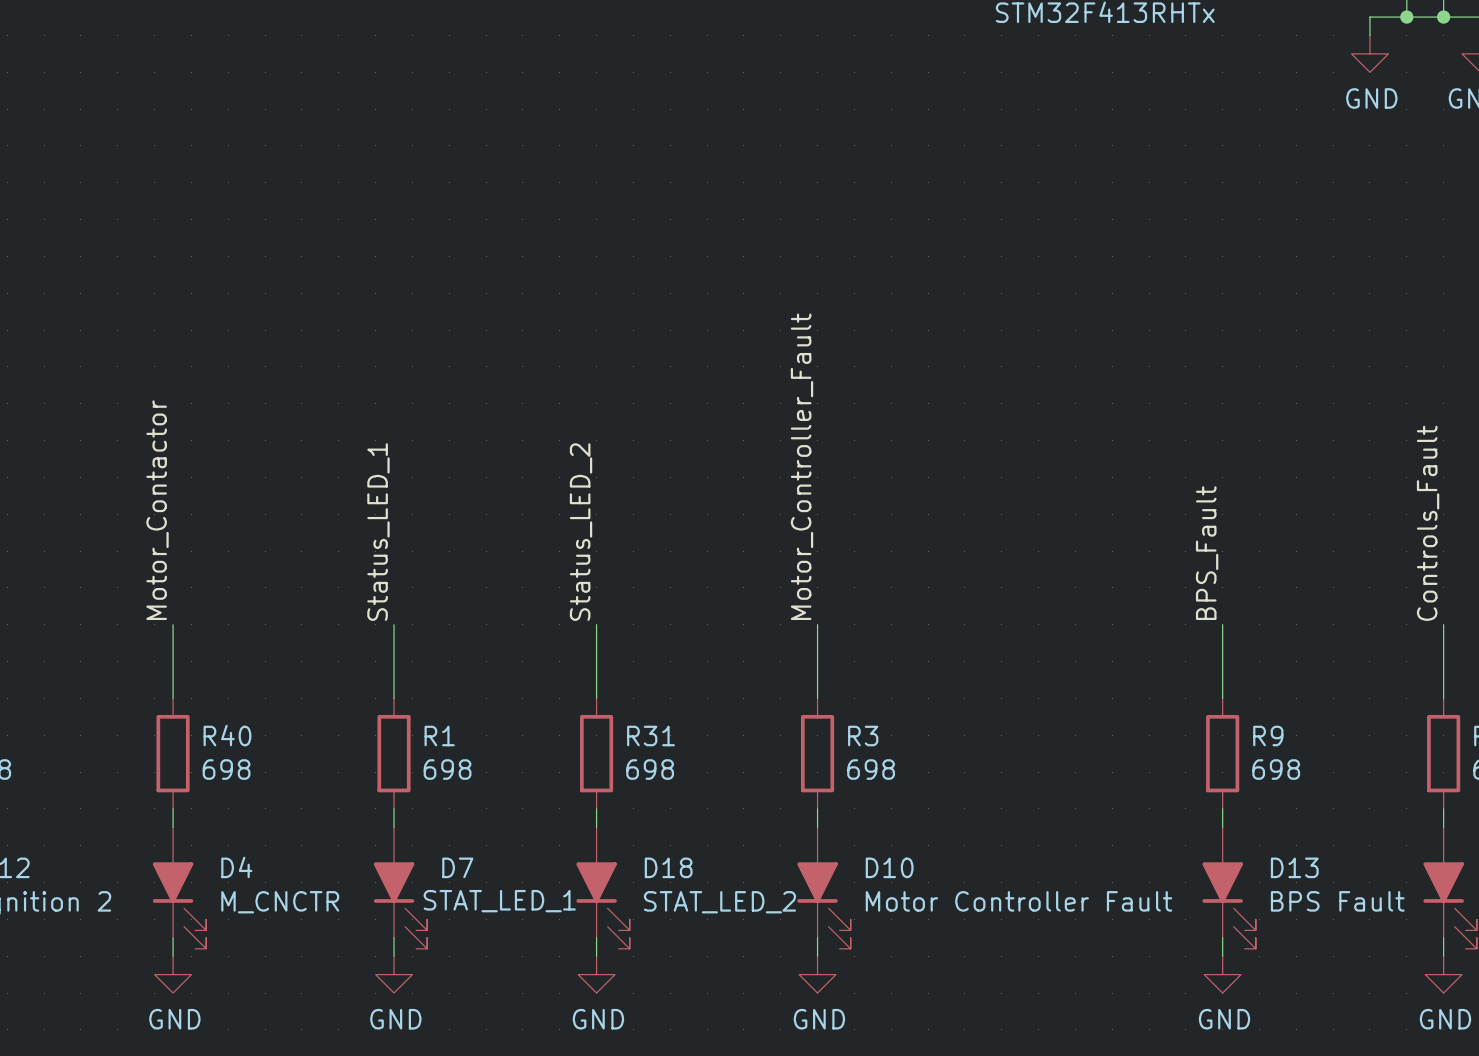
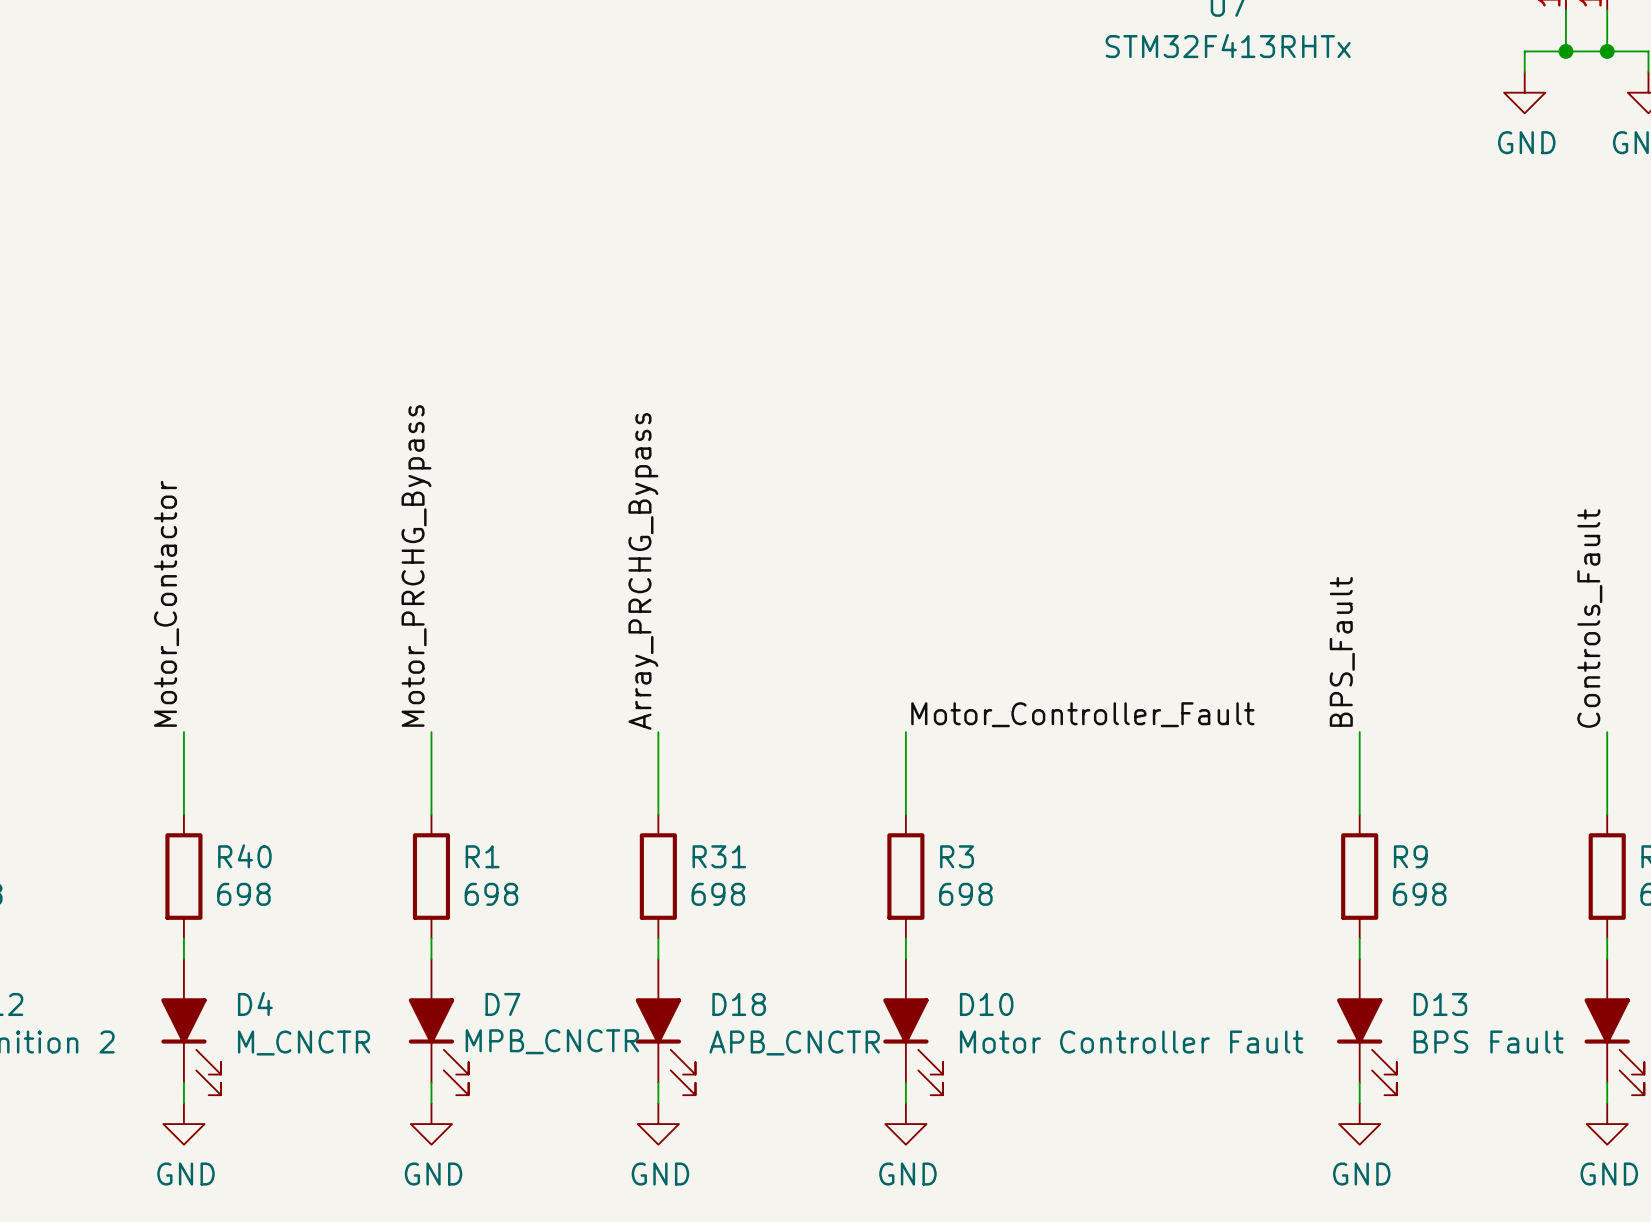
label rotation: 0° (801, 466) -> 90° clockwise (1082, 714)
label: Status_LED_1 (378, 532) -> Motor_PRCHG_Bypass (416, 565)
label: Status_LED_2 (581, 532) -> Array_PRCHG_Bypass (643, 571)
D7 value: STAT_LED_1 (499, 901) -> MPB_CNCTR (552, 1041)
D18 value: STAT_LED_2 (719, 902) -> APB_CNCTR (794, 1043)

